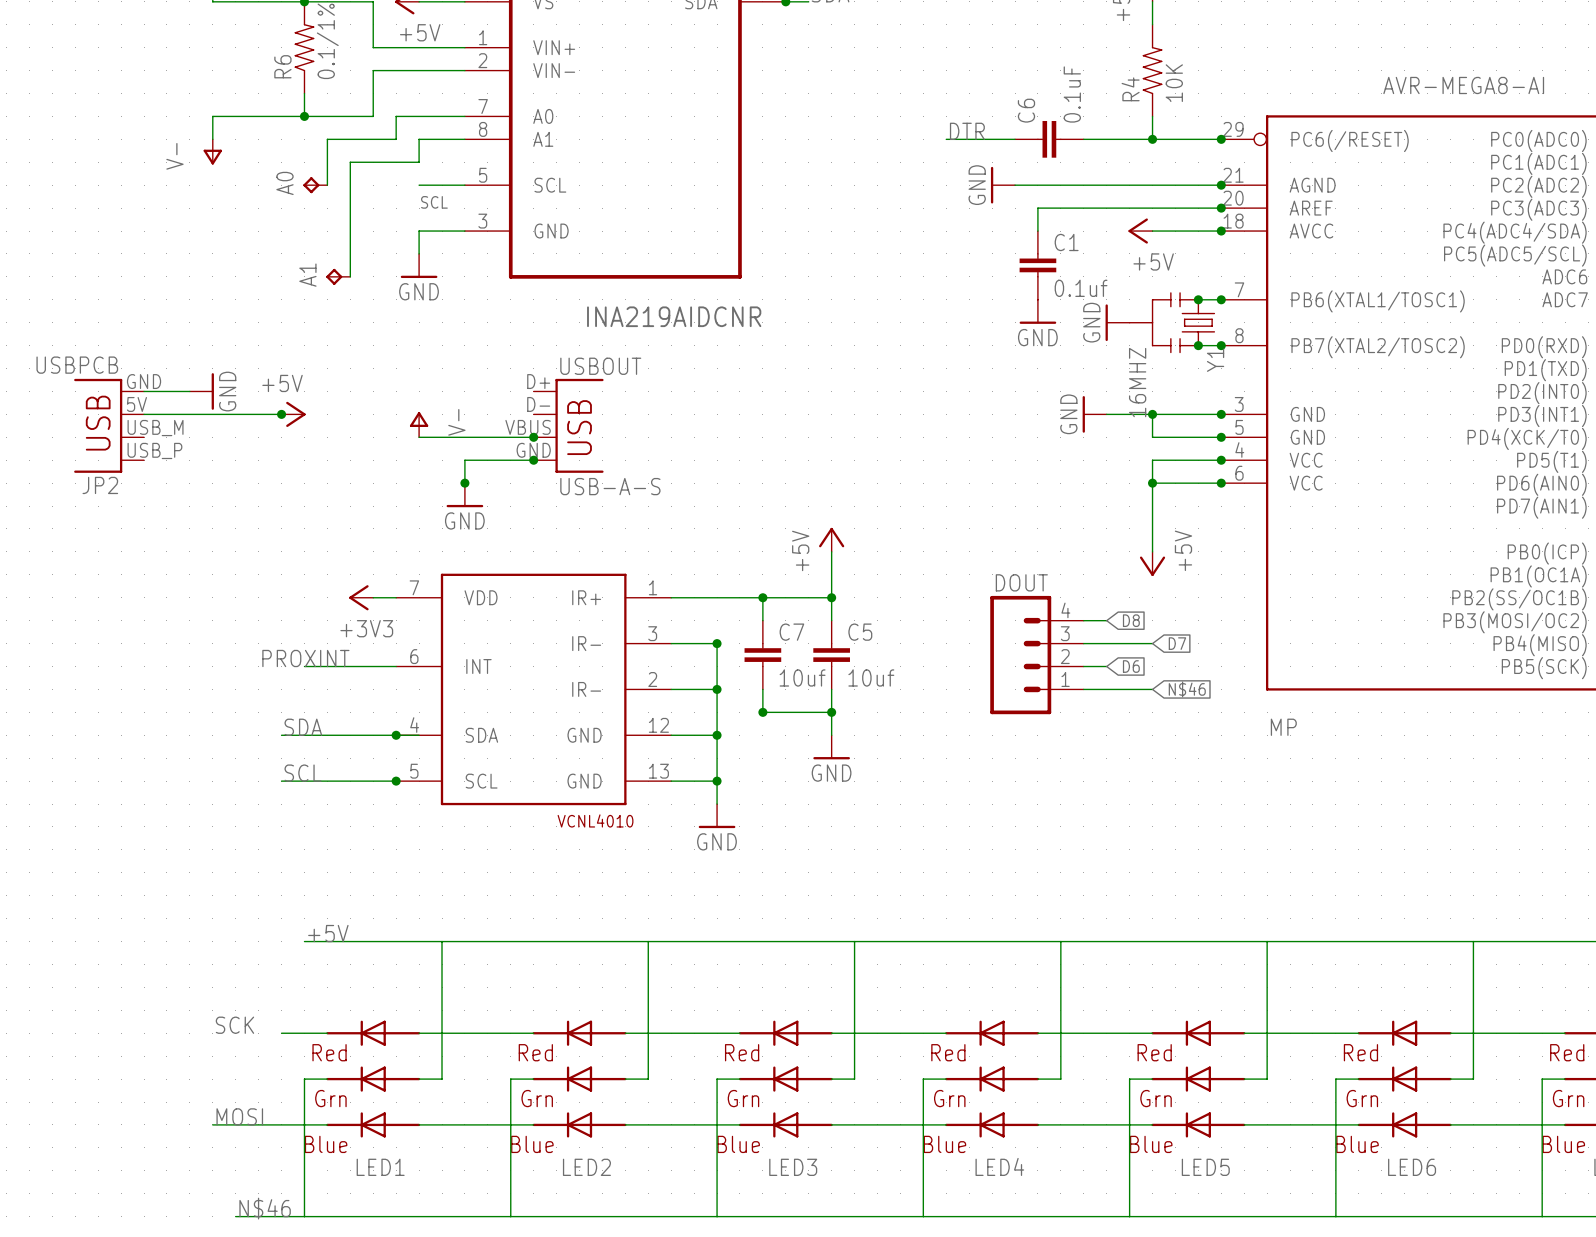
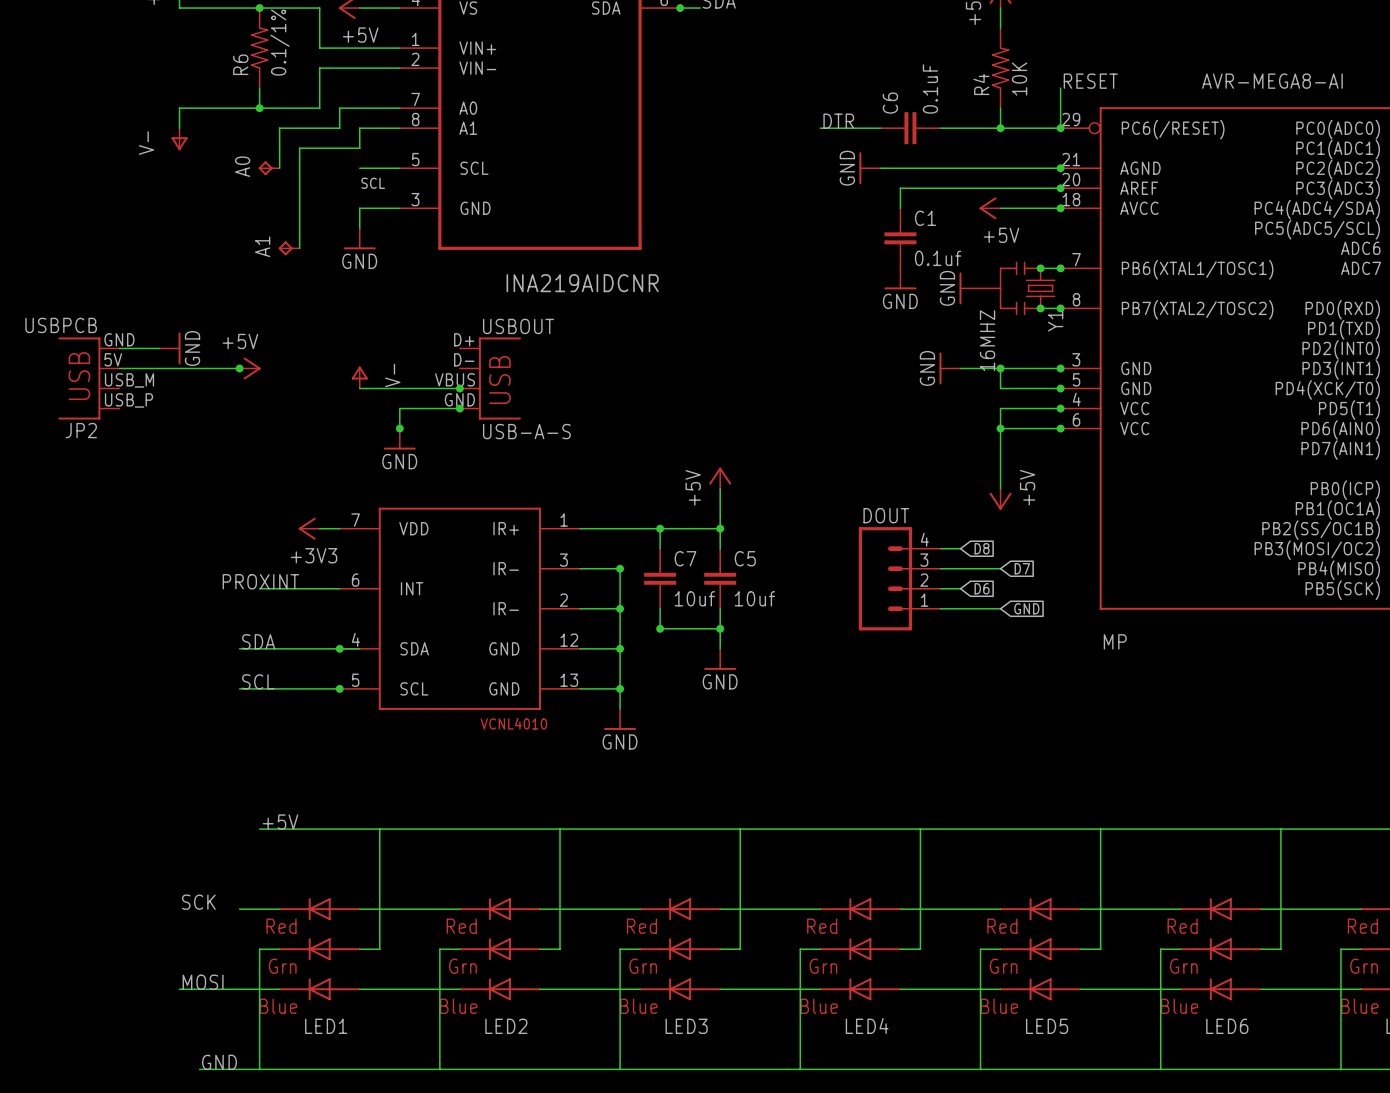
label: none -> RESET (1090, 81)
wire: none -> (1060, 88) (1060, 128)
global label: N$46 (1187, 689) -> GND (1026, 608)
label: N$46 (265, 1208) -> GND (219, 1062)

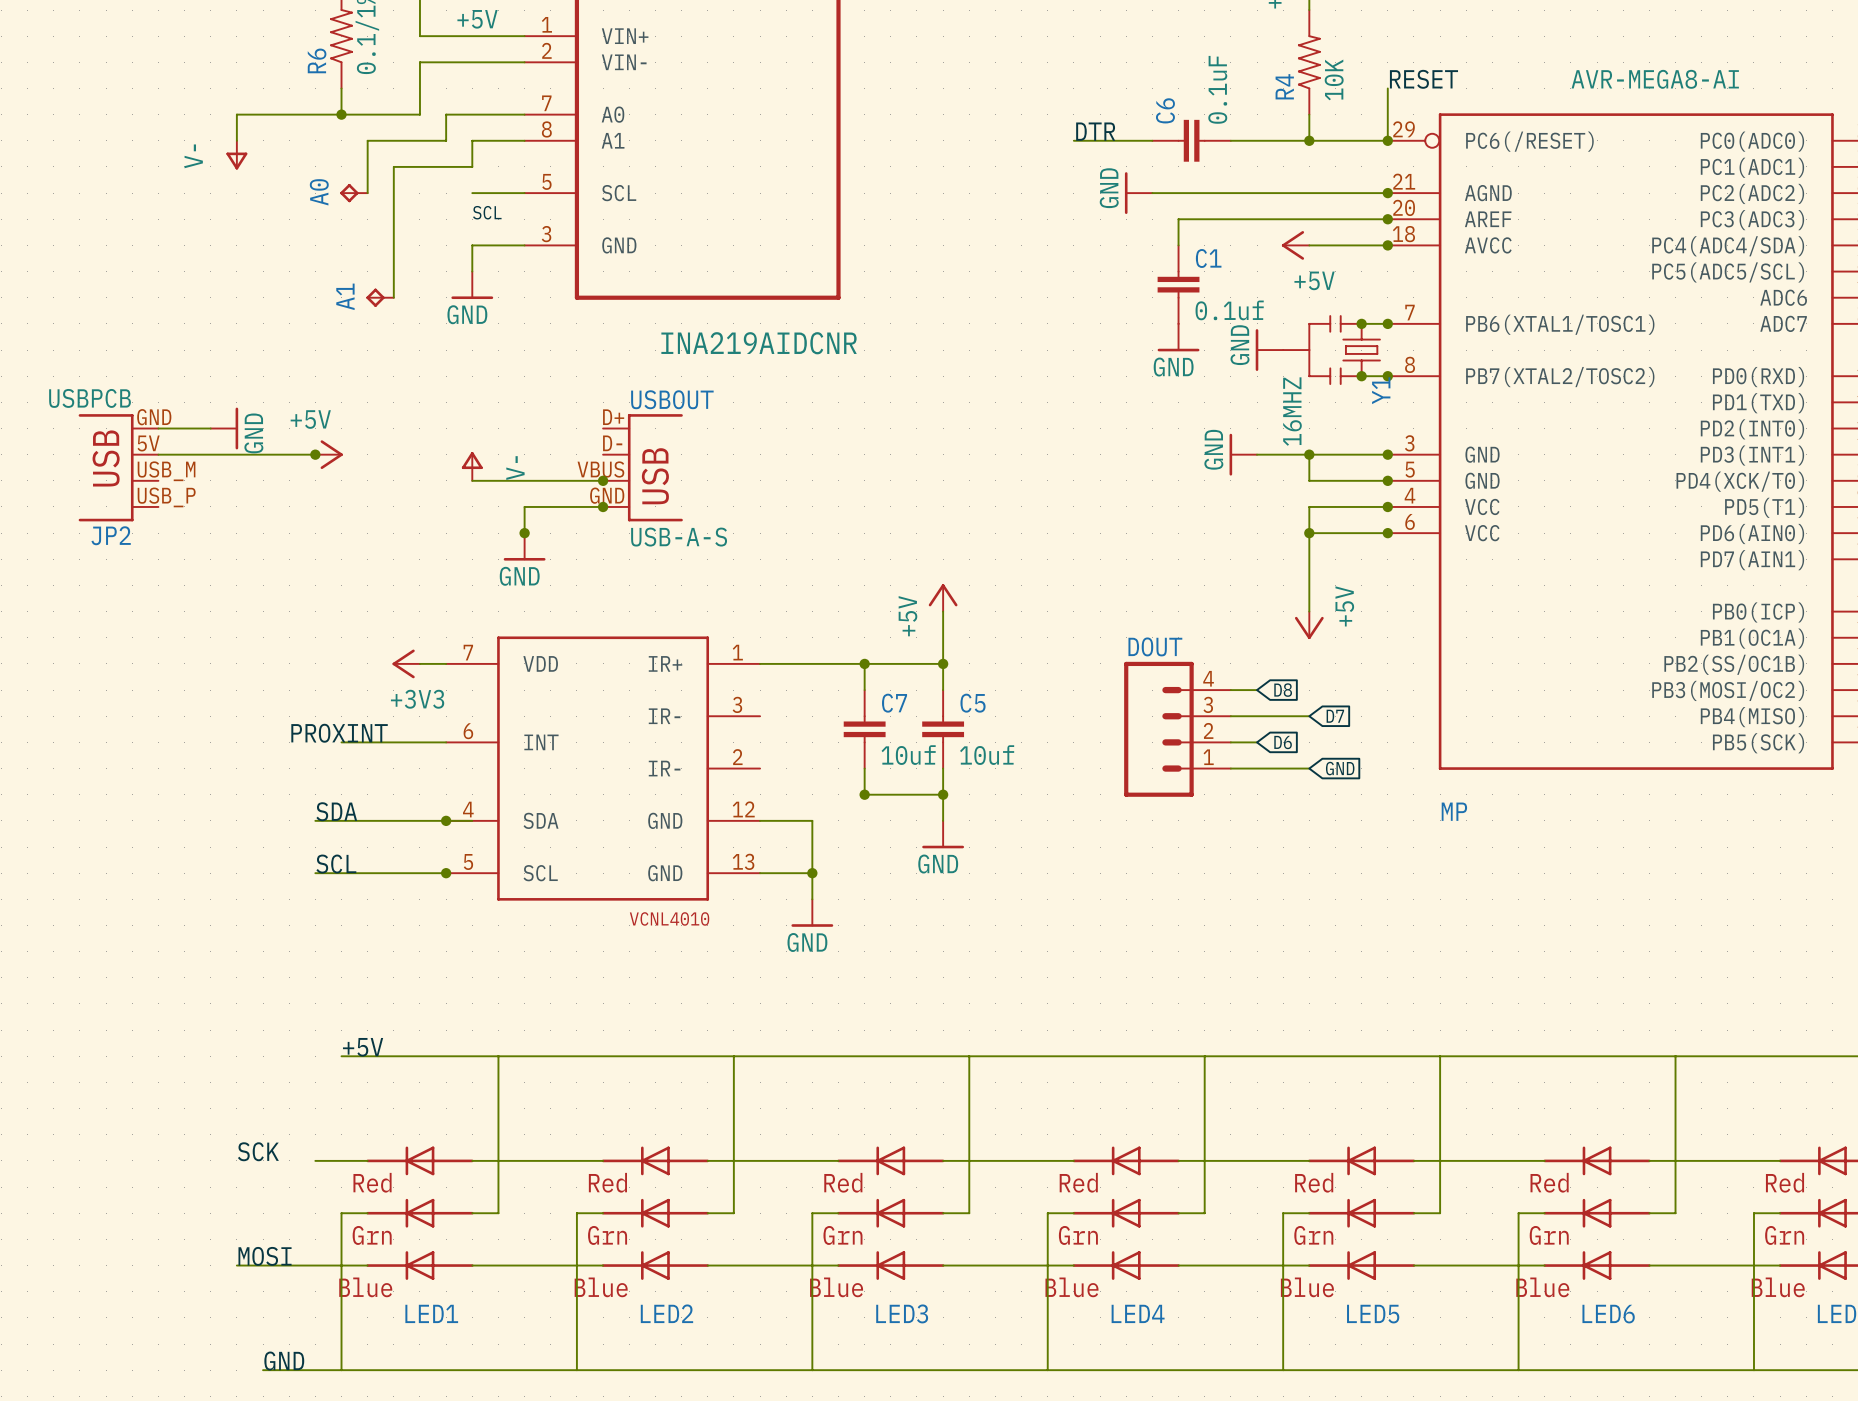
wire: (580, 568) (620, 568) (620, 648) -> none
junction: (620, 568) -> none
wire: (580, 608) (620, 608) -> none
junction: (620, 608) -> none
junction: (620, 648) -> none

